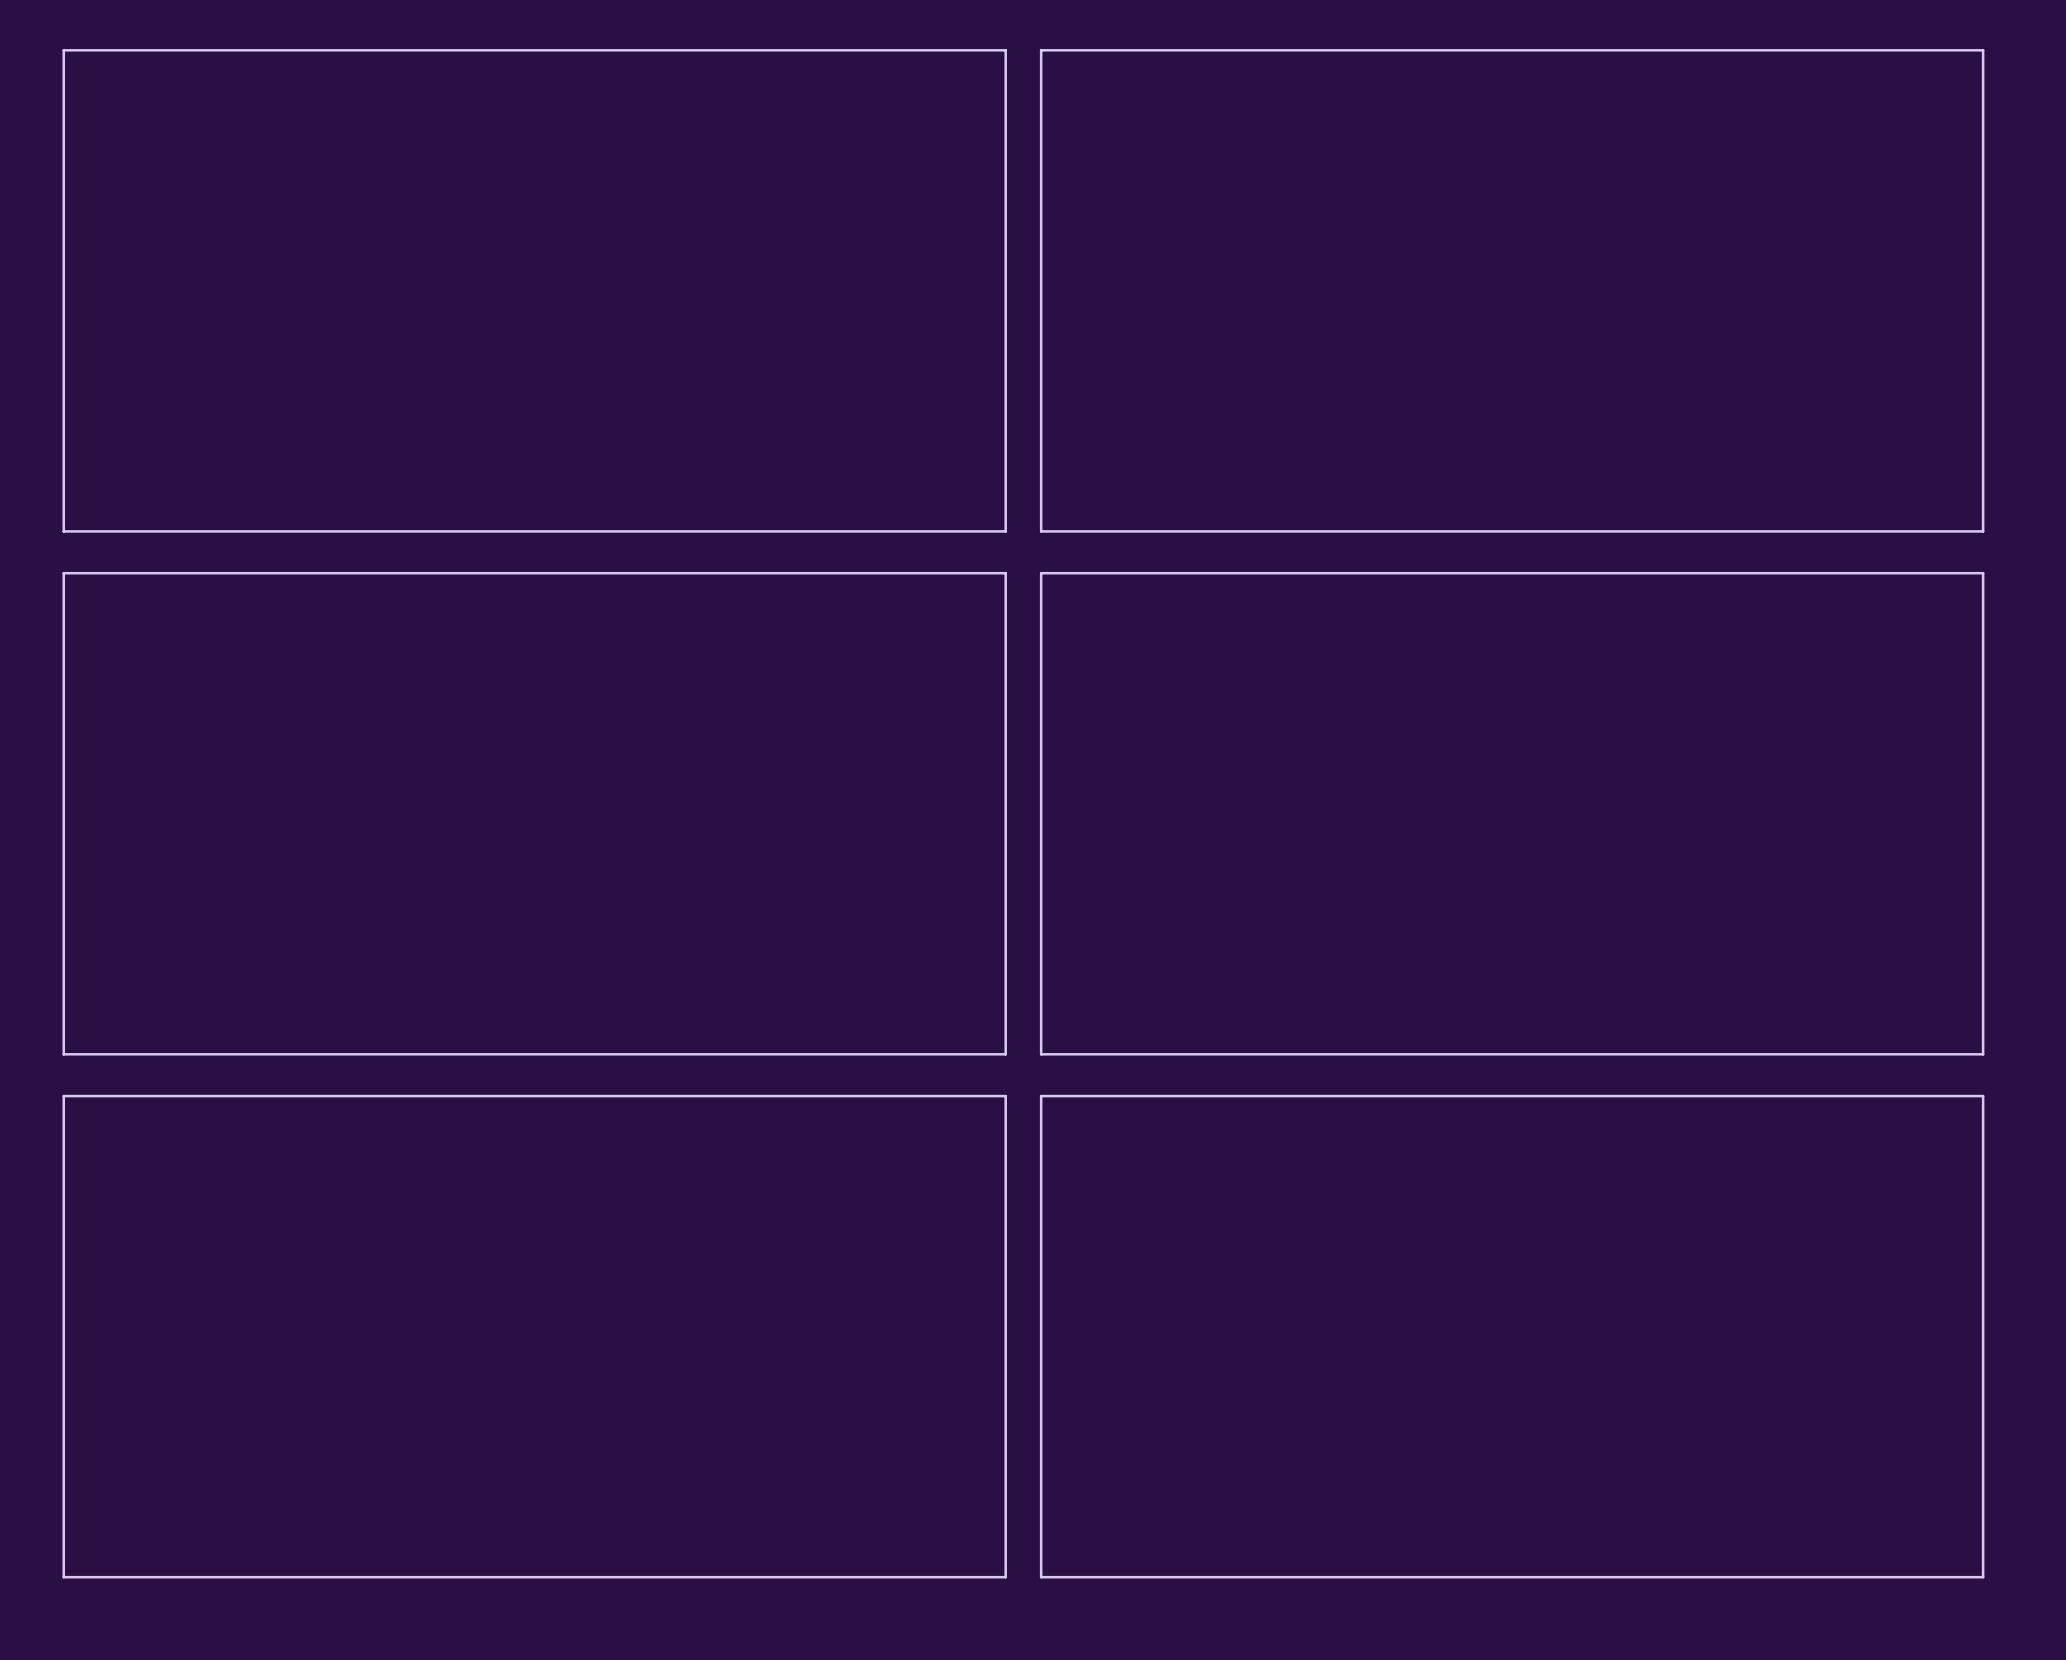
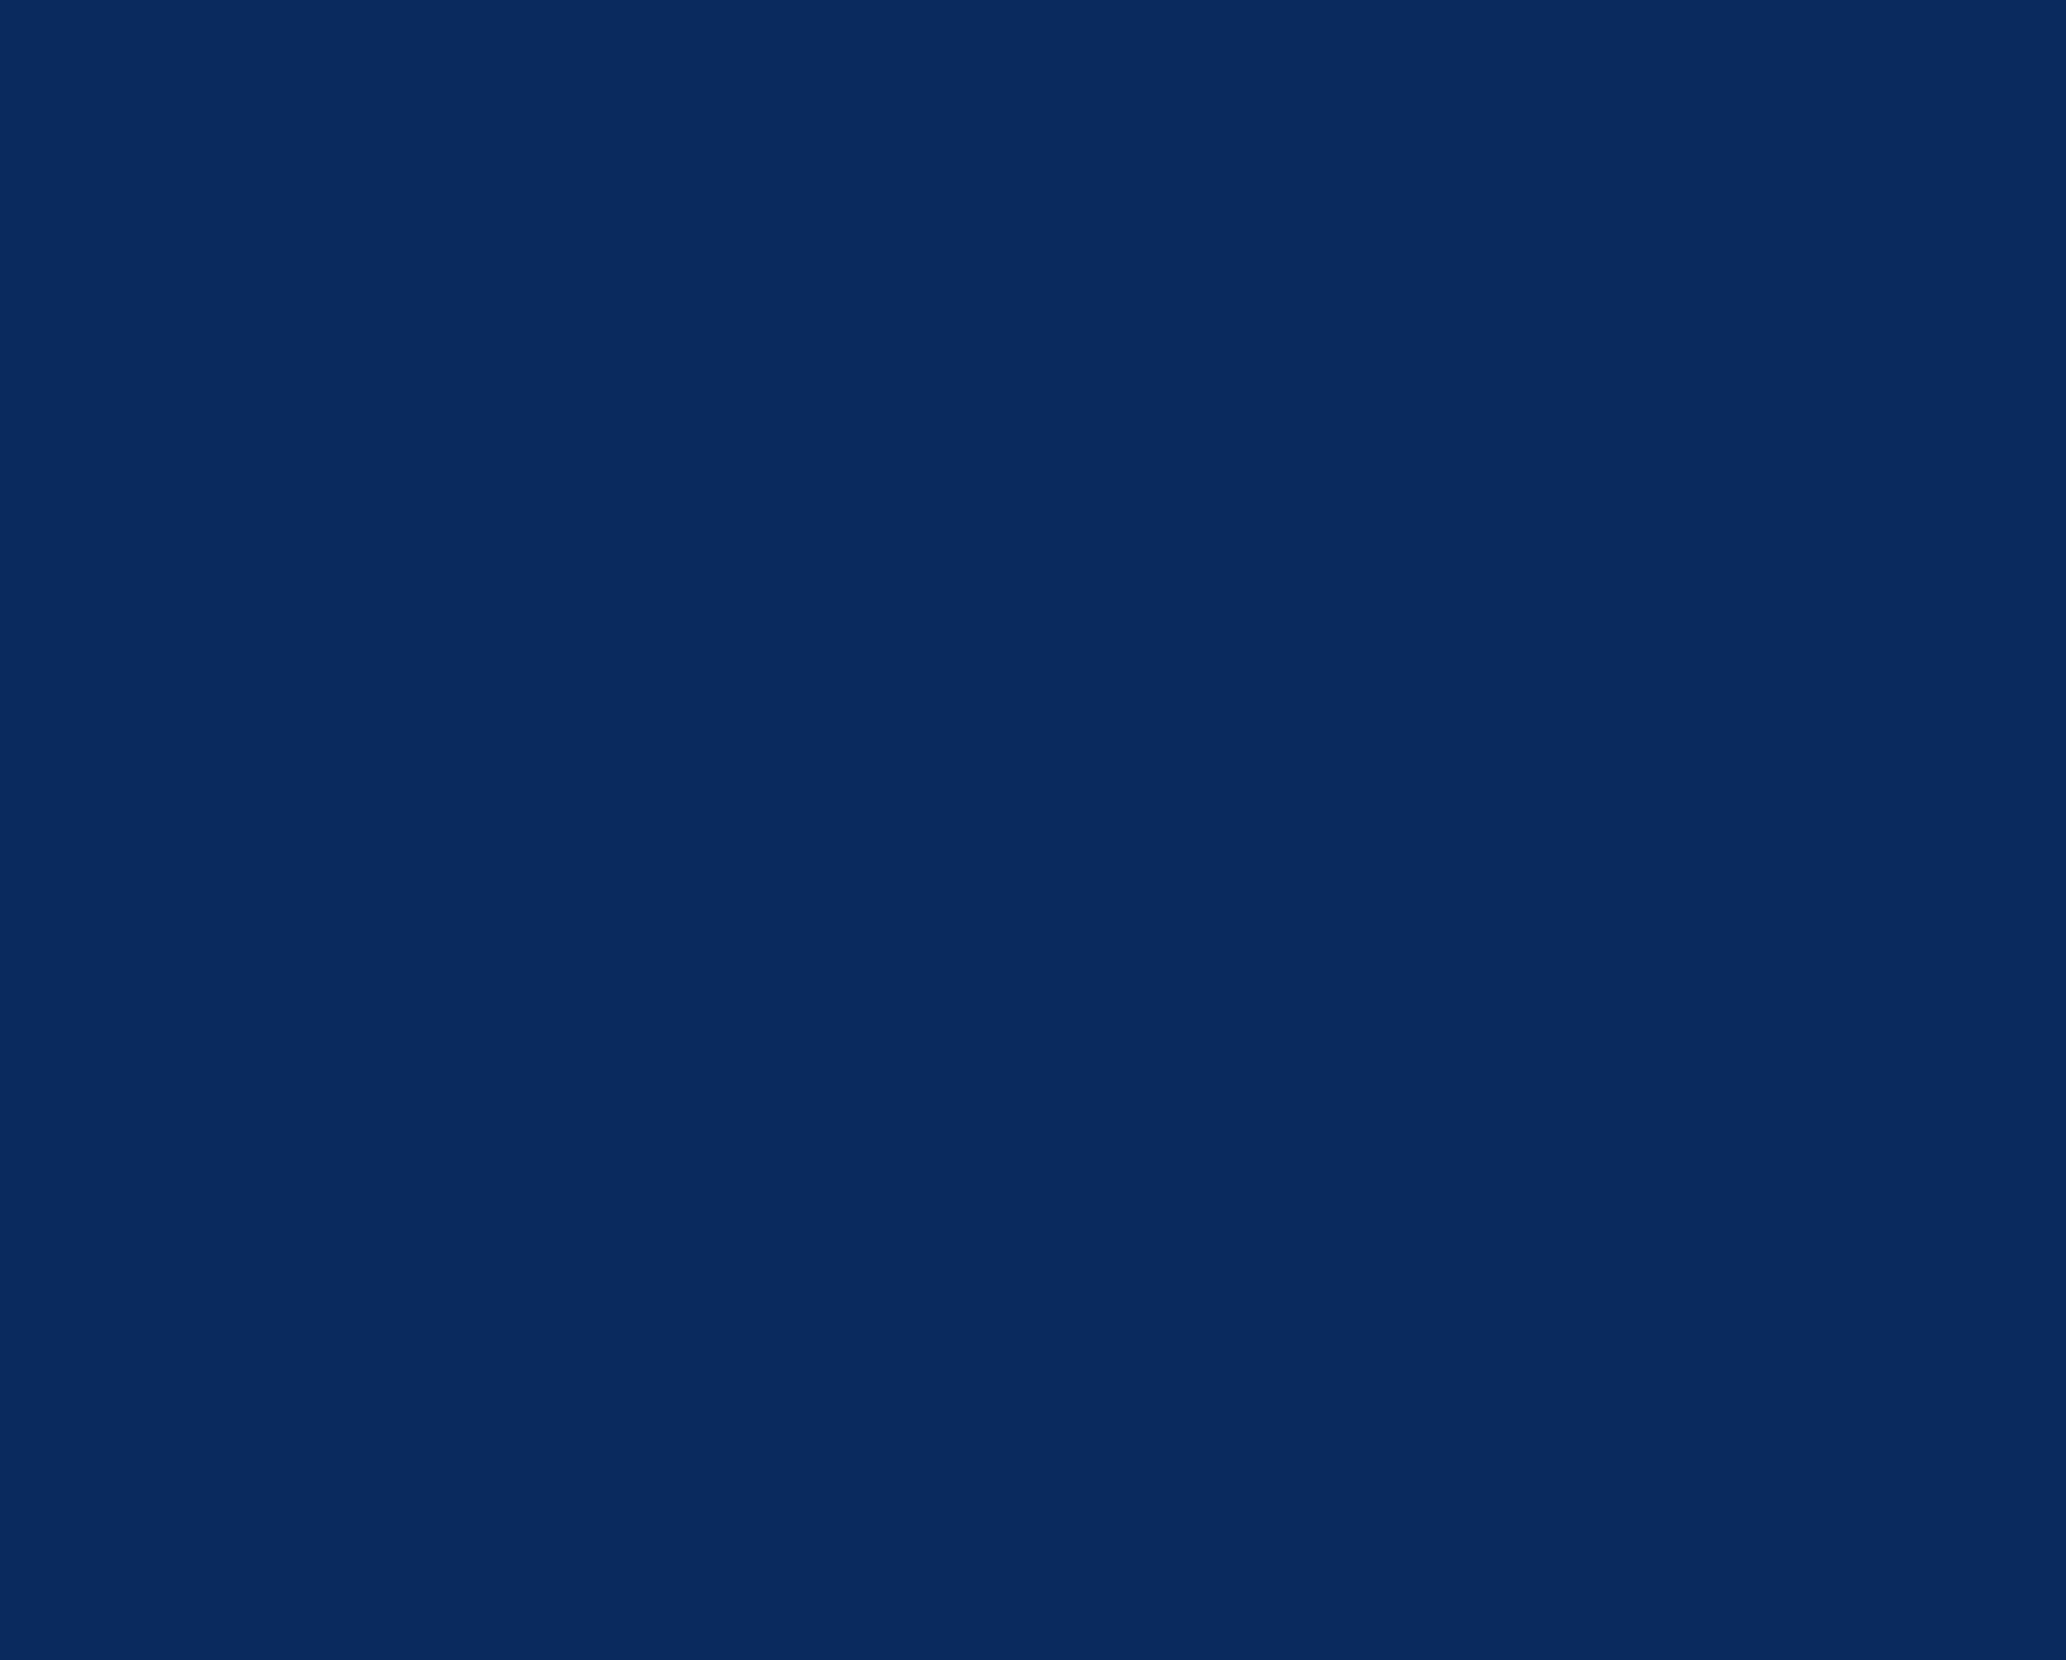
board edge: (1005, 50) (63, 50) (63, 531) (1005, 531) (1005, 50) -> none
board edge: (1983, 50) (1983, 531) (1041, 531) (1041, 50) (1983, 50) -> none
board edge: (1005, 573) (63, 573) (63, 1054) (1005, 1054) (1005, 573) -> none
board edge: (1983, 573) (1041, 573) (1041, 1054) (1983, 1054) (1983, 573) -> none
board edge: (1005, 1096) (63, 1096) (63, 1577) (1005, 1577) (1005, 1096) -> none
board edge: (1983, 1096) (1983, 1577) (1041, 1577) (1041, 1096) (1983, 1096) -> none

